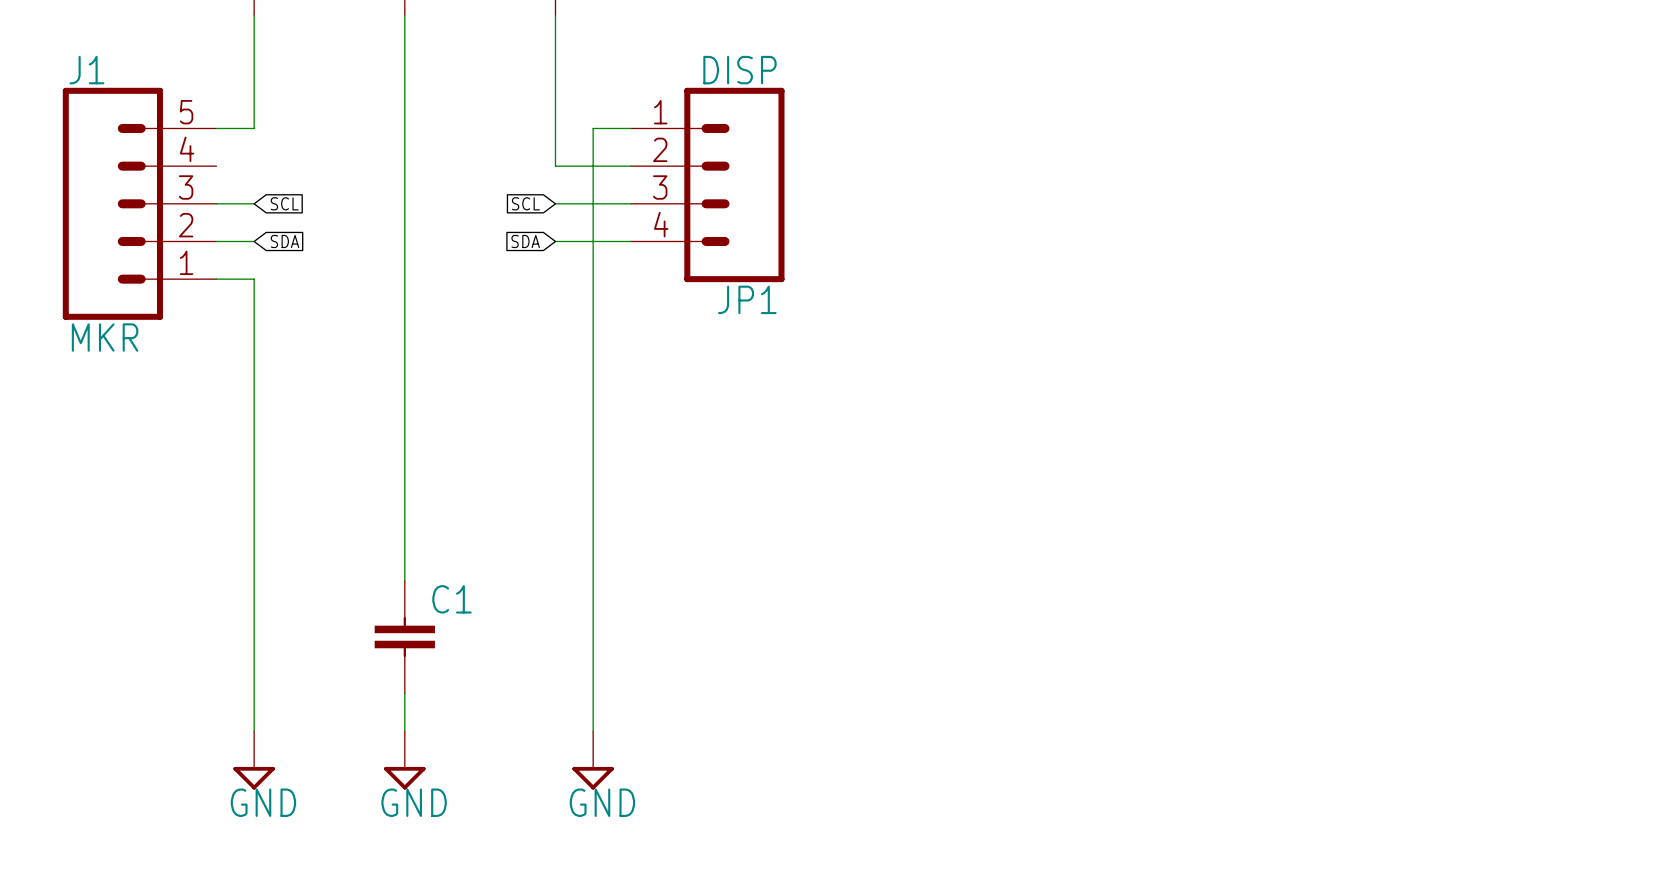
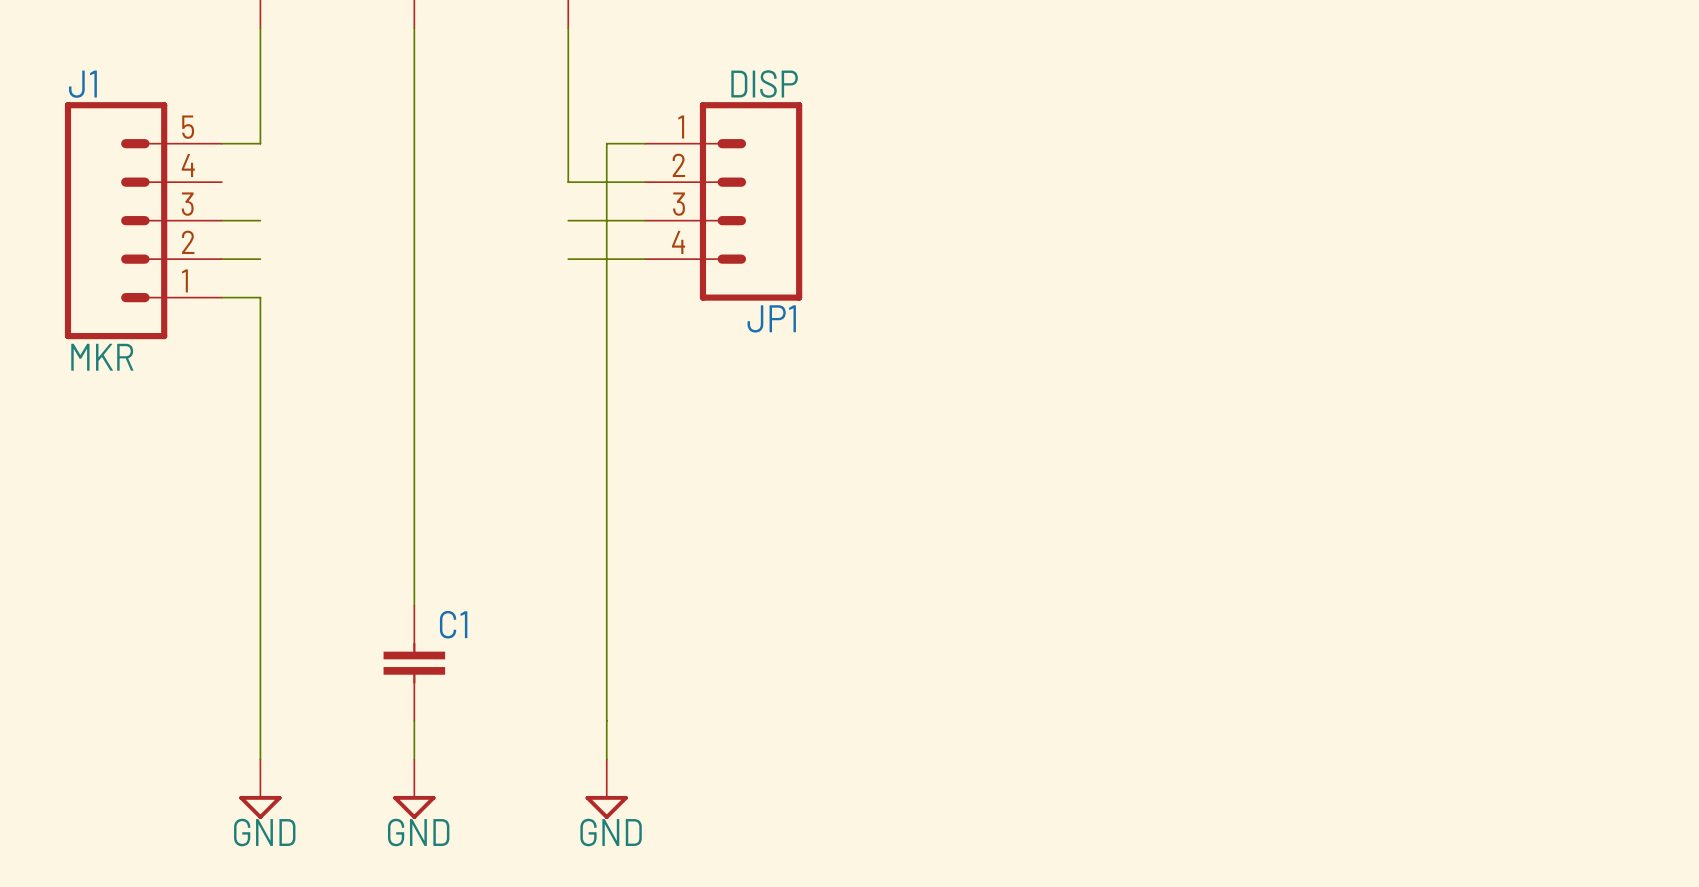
global label: SCL (284, 203) -> none
global label: SCL (525, 203) -> none
global label: SDA (285, 241) -> none
global label: SDA (525, 241) -> none

